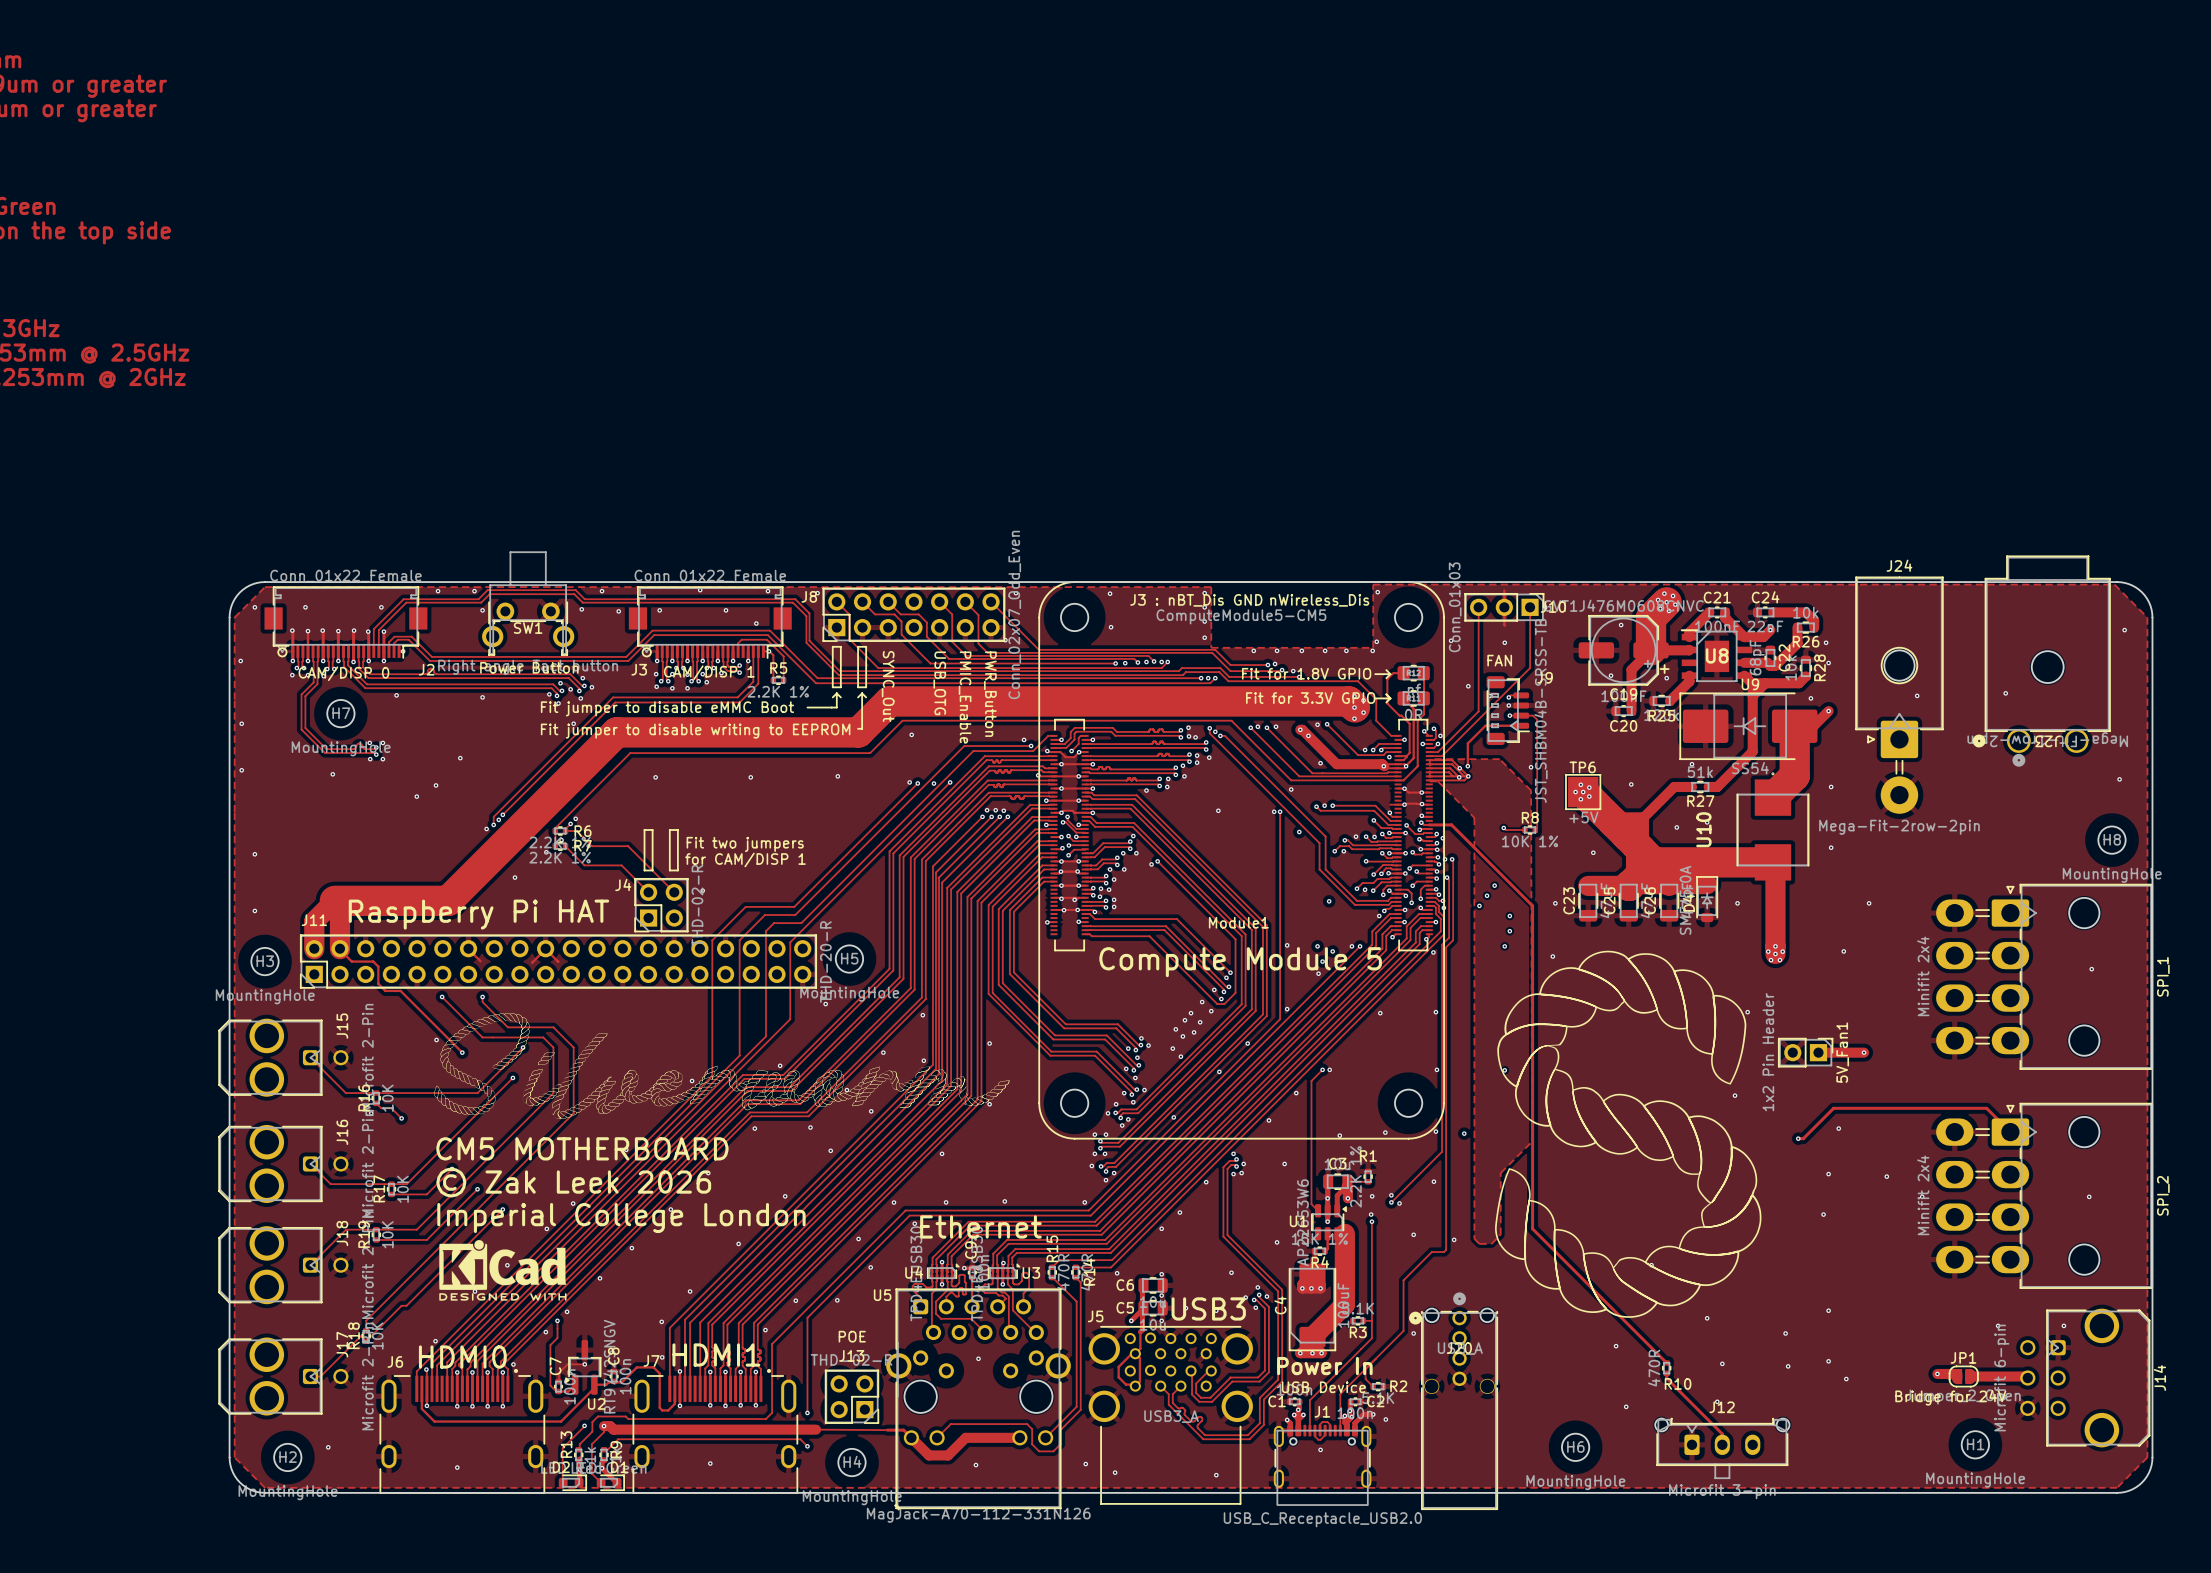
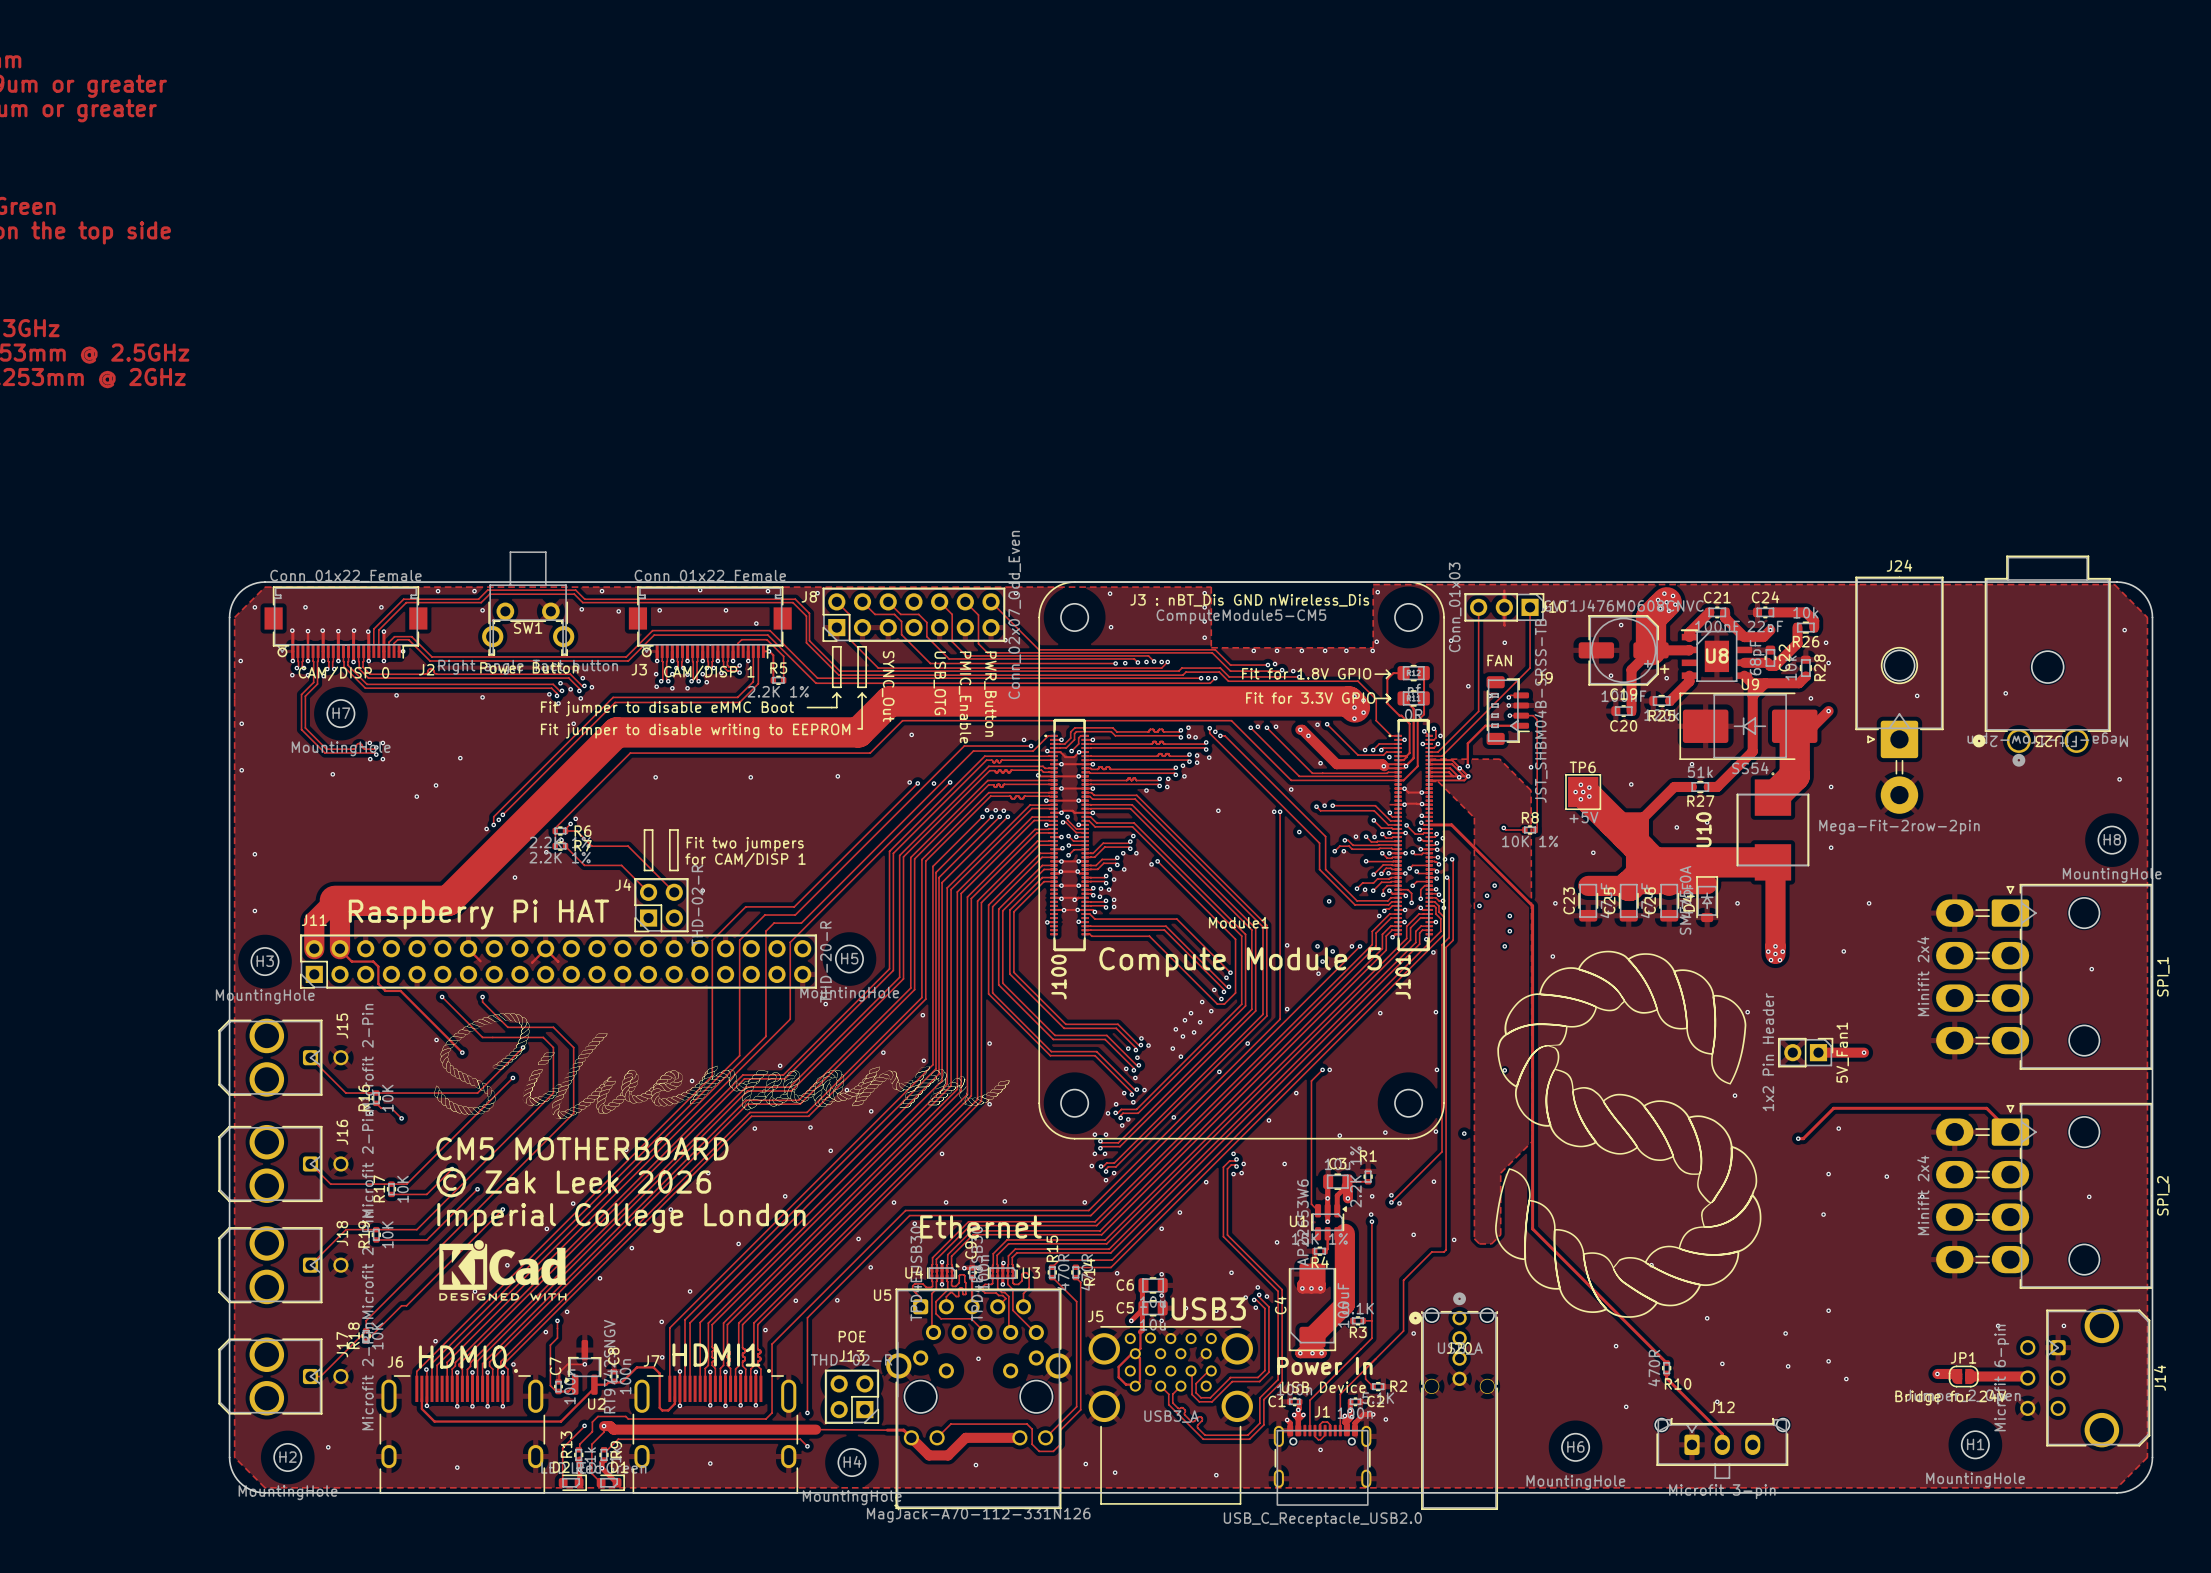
J100: none -> (1066, 835)
J101: none -> (1410, 835)

